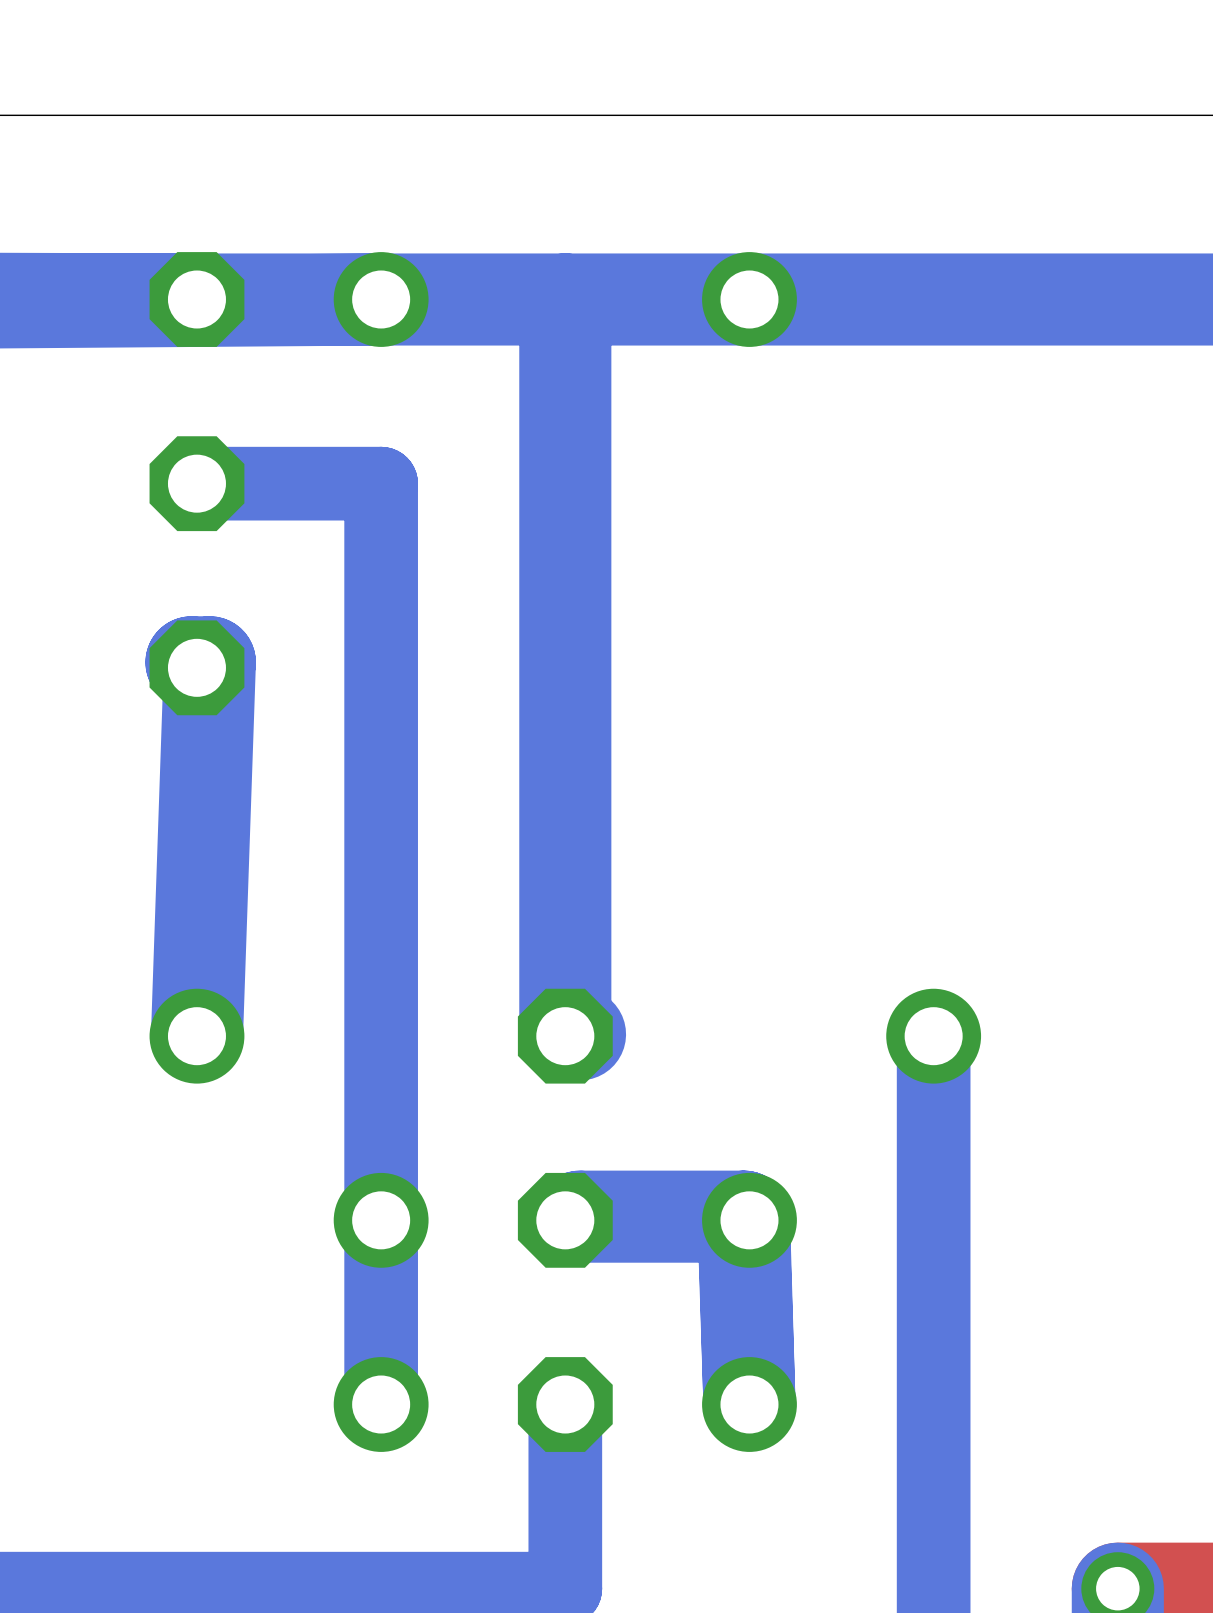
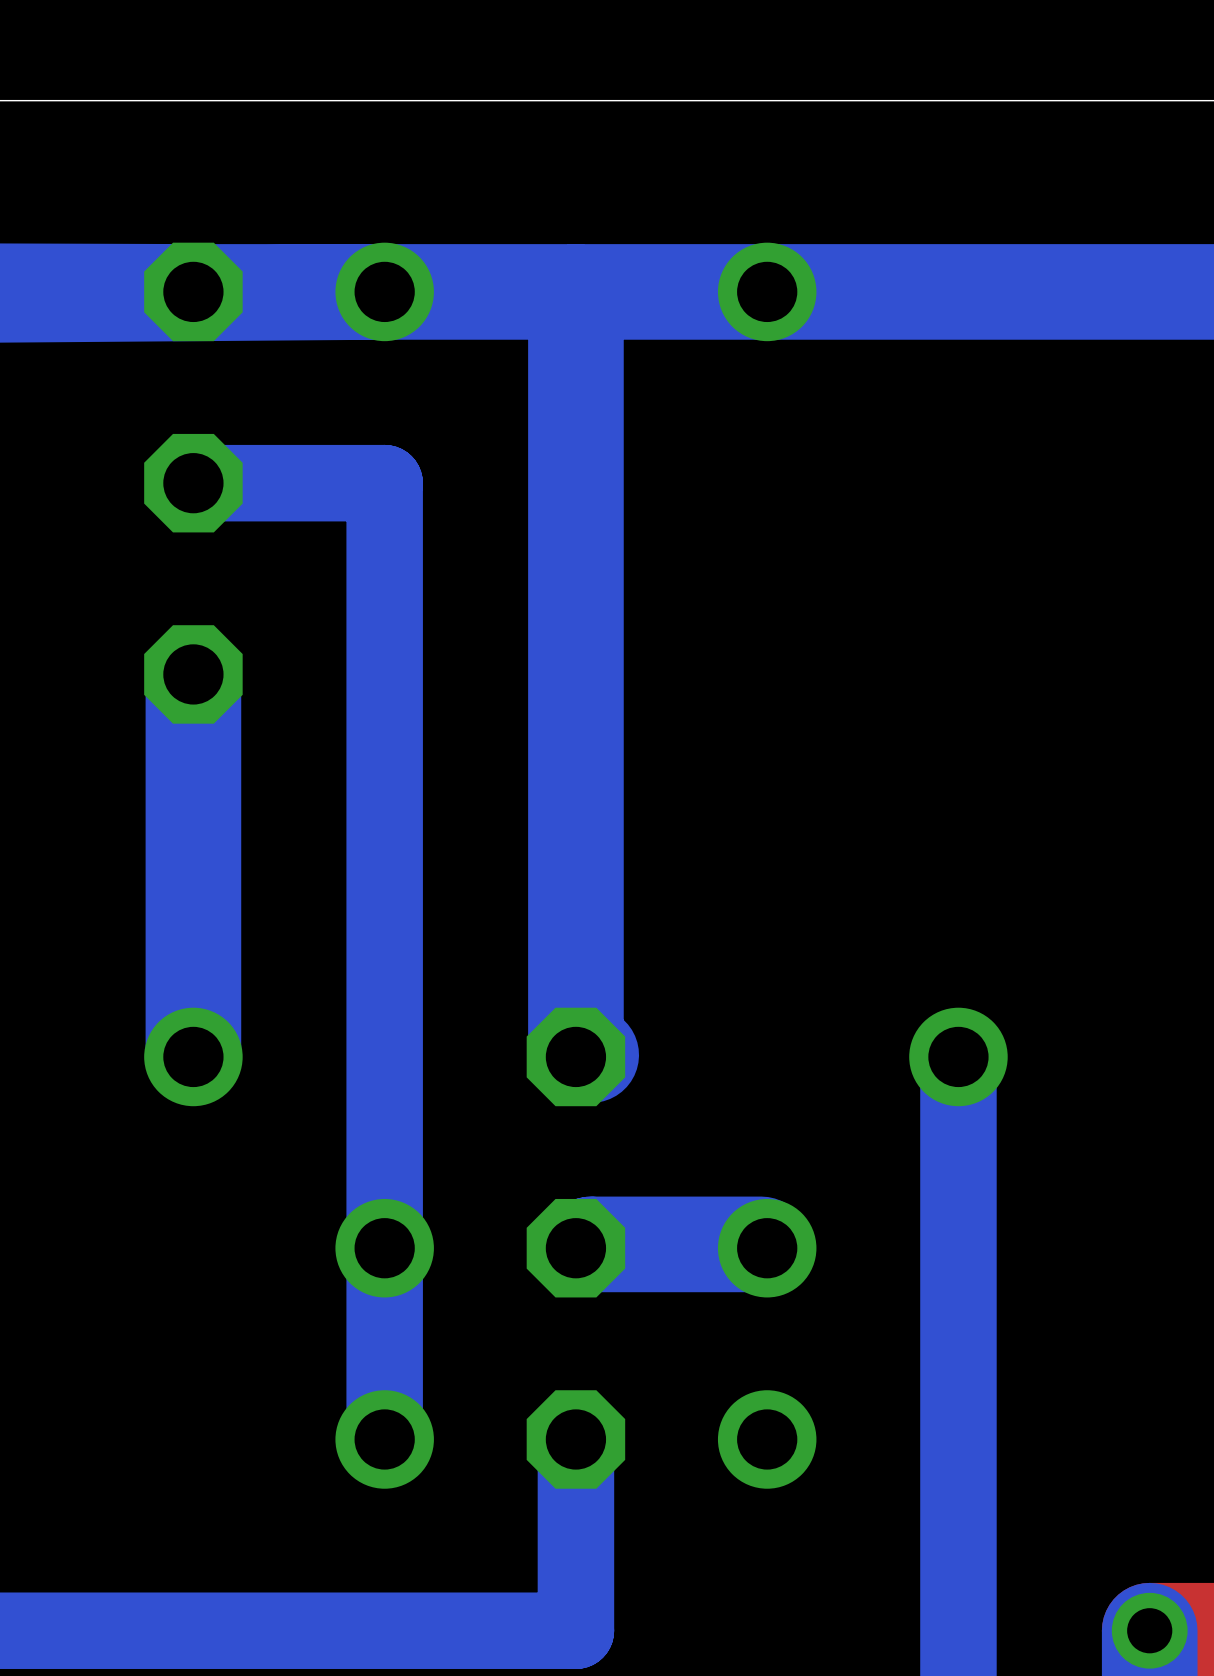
bottom track: (196, 667) (191, 662) (209, 662) (196, 1036) -> (193, 674) (193, 1056)
bottom track: (743, 1216) (743, 1235) (749, 1404) (743, 1216) -> none

